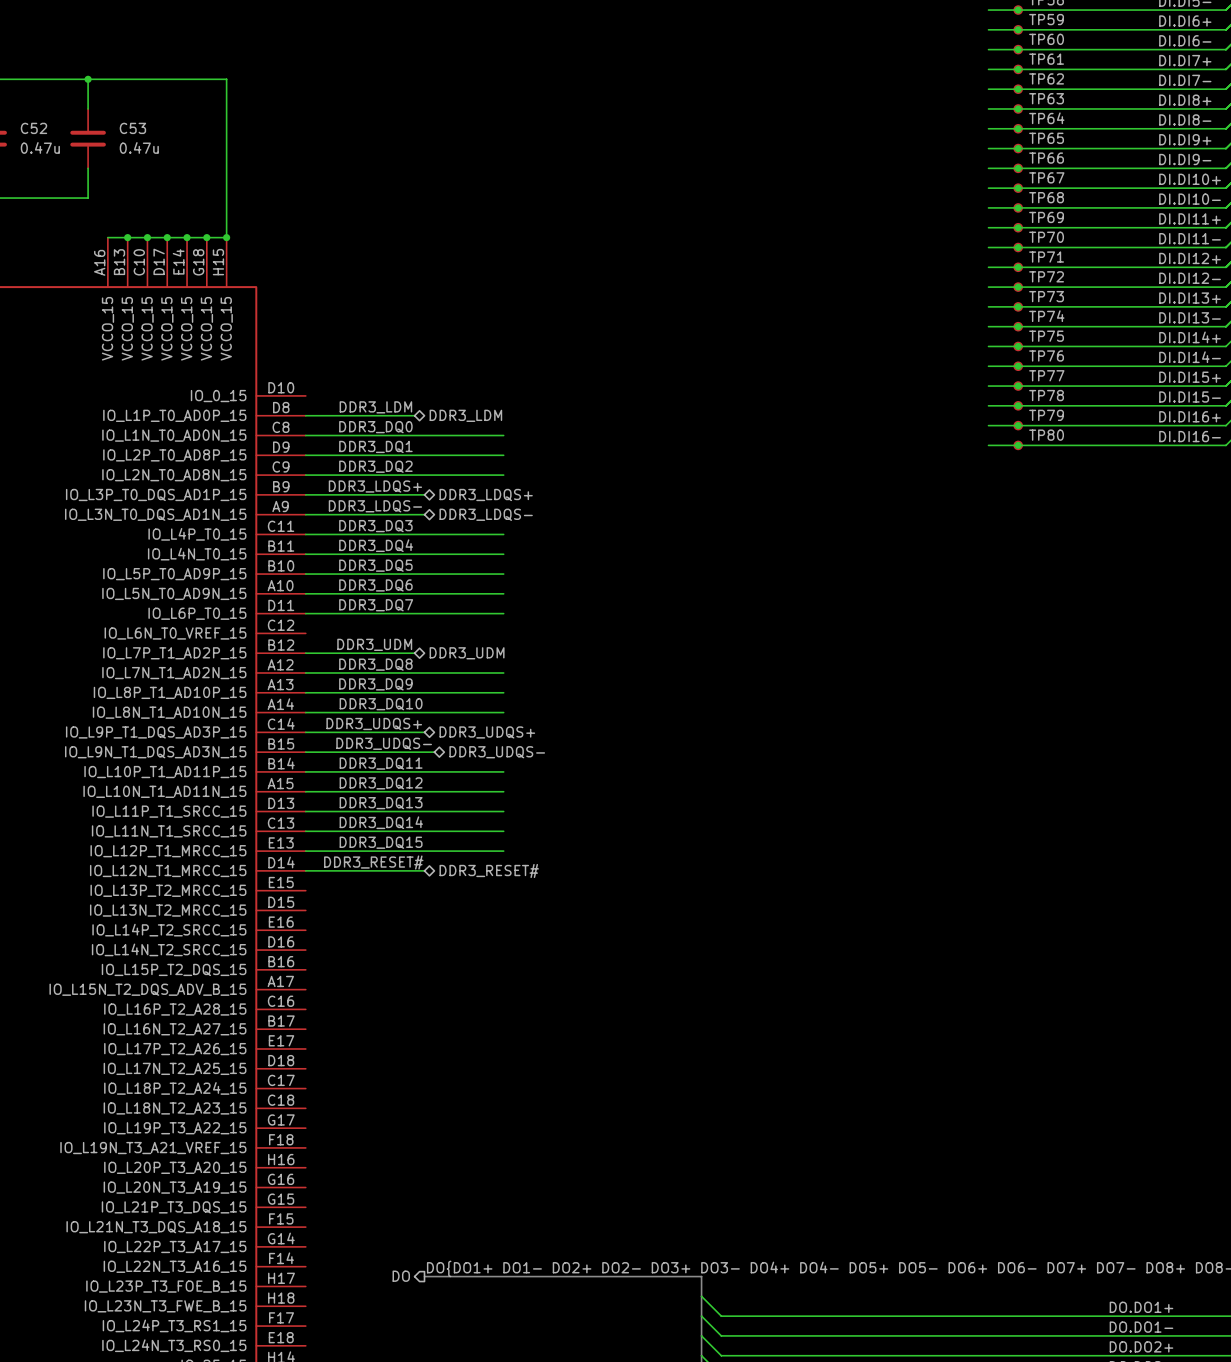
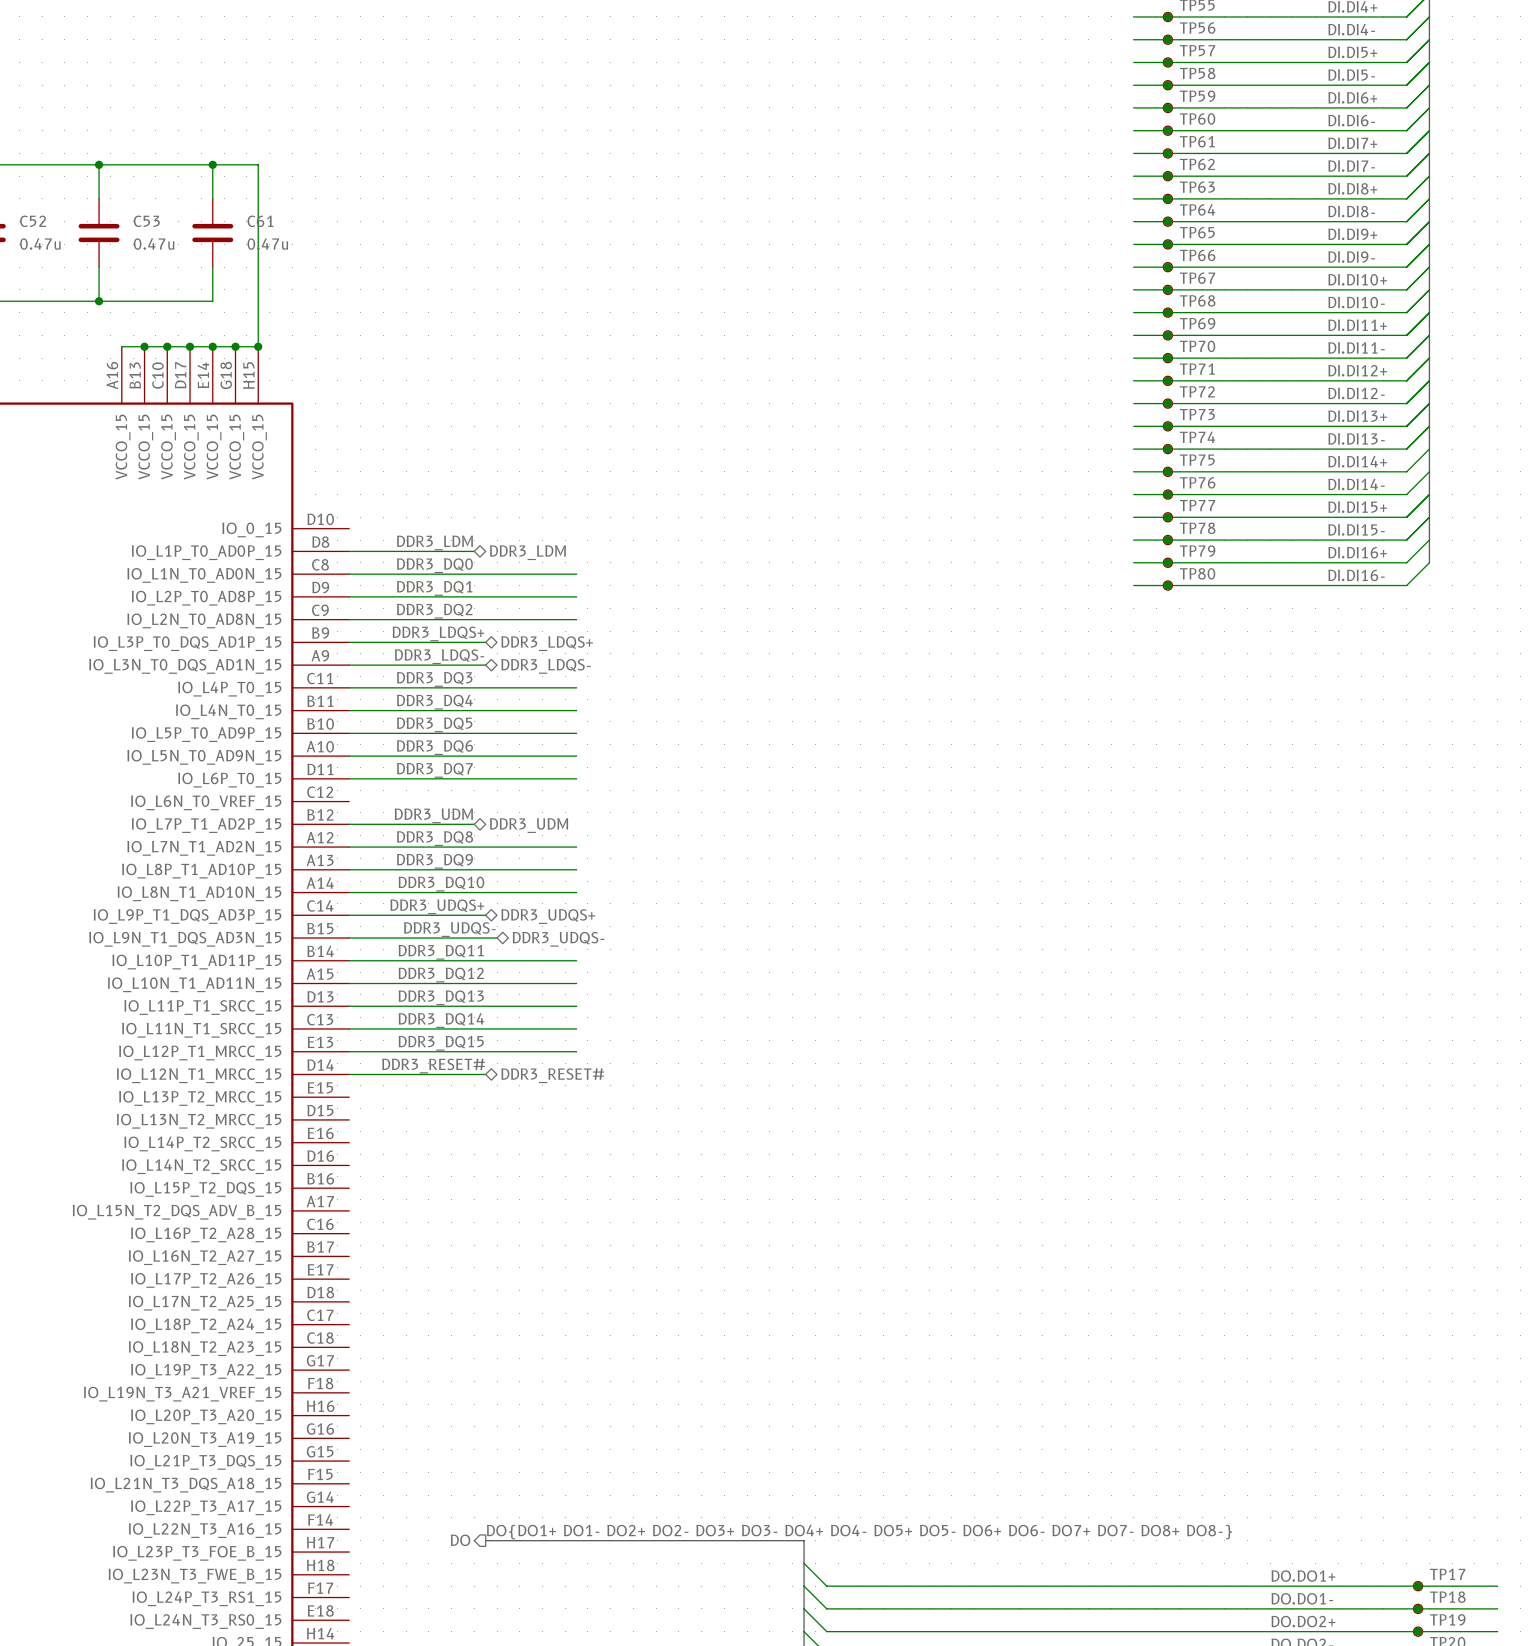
wire: none -> (212, 164) (212, 198)
junction: none -> (212, 164)
C61: none -> 0.47u (212, 233)
wire: none -> (212, 267) (212, 301) (99, 301)
junction: none -> (99, 301)

